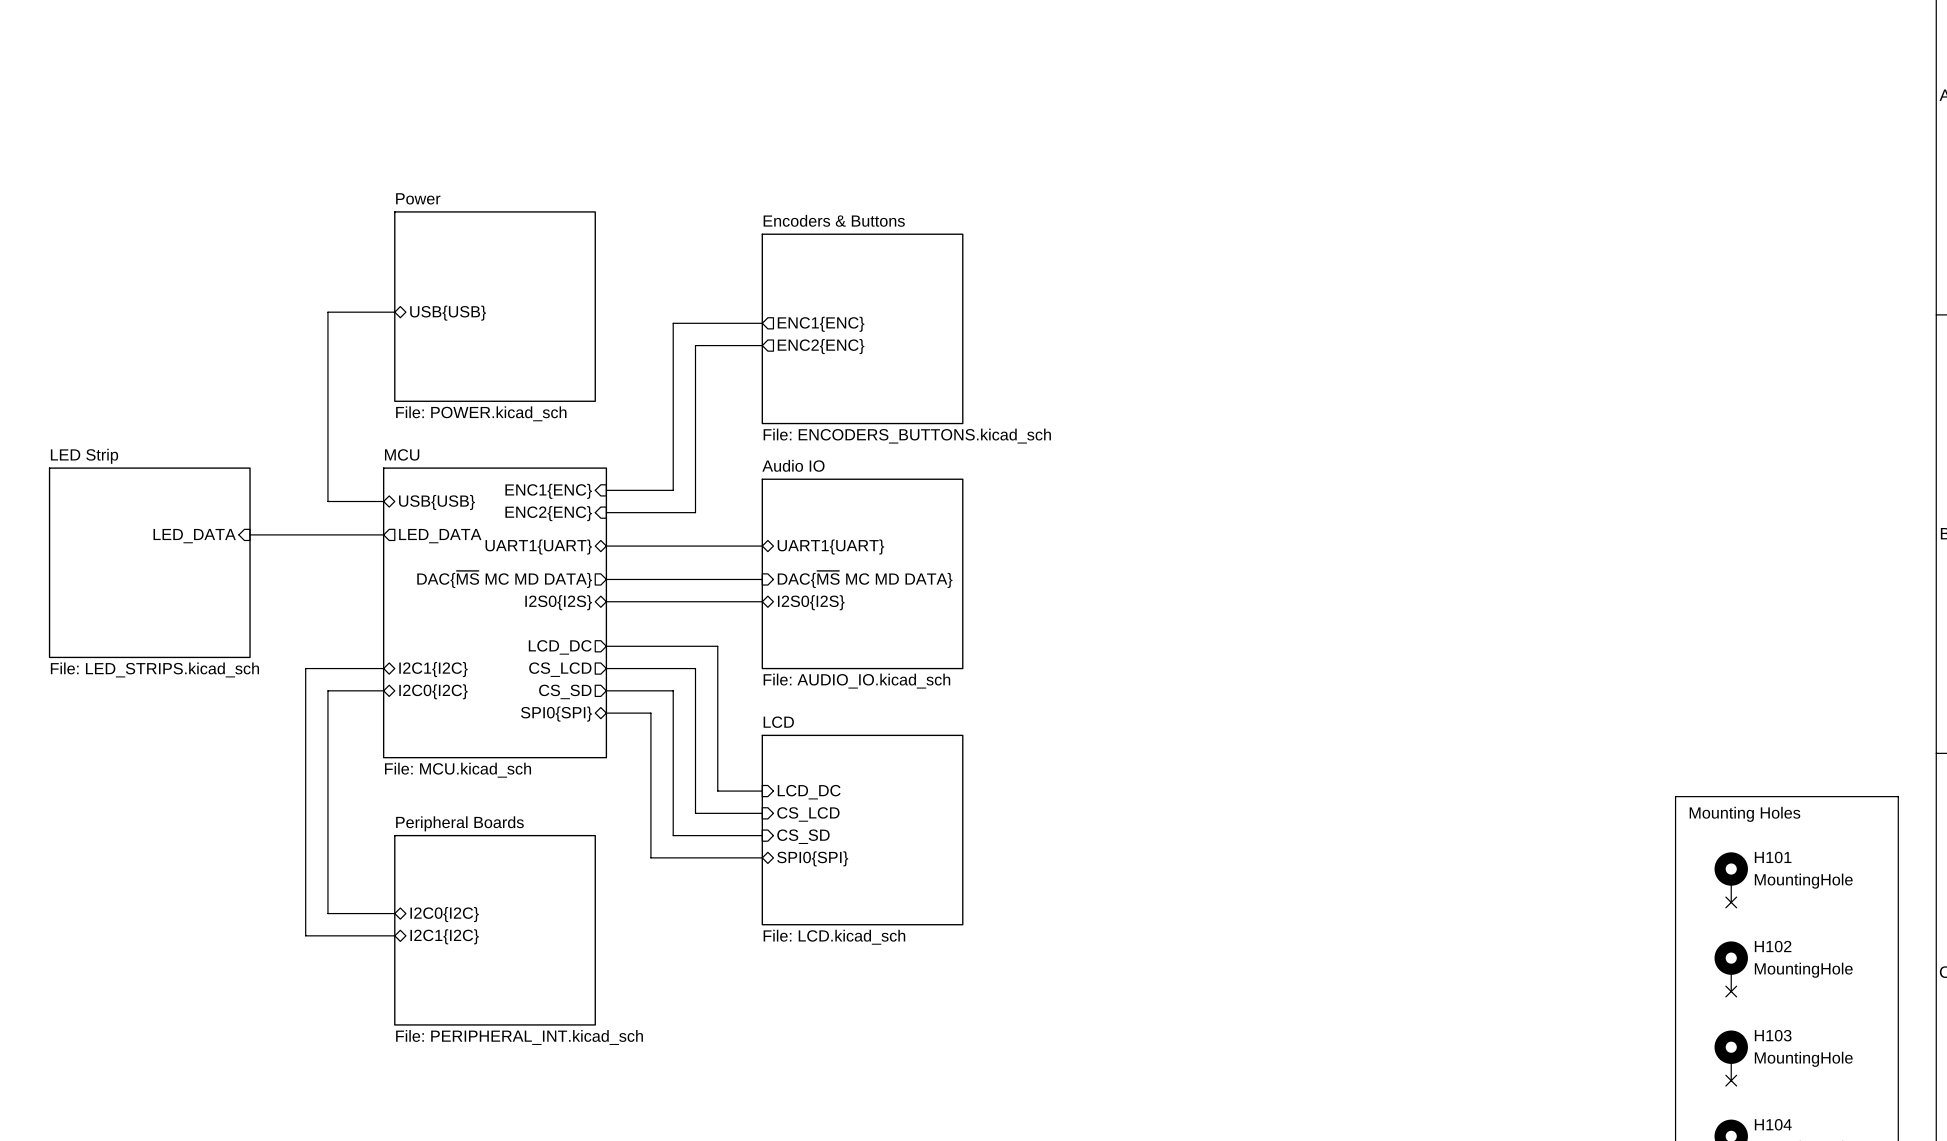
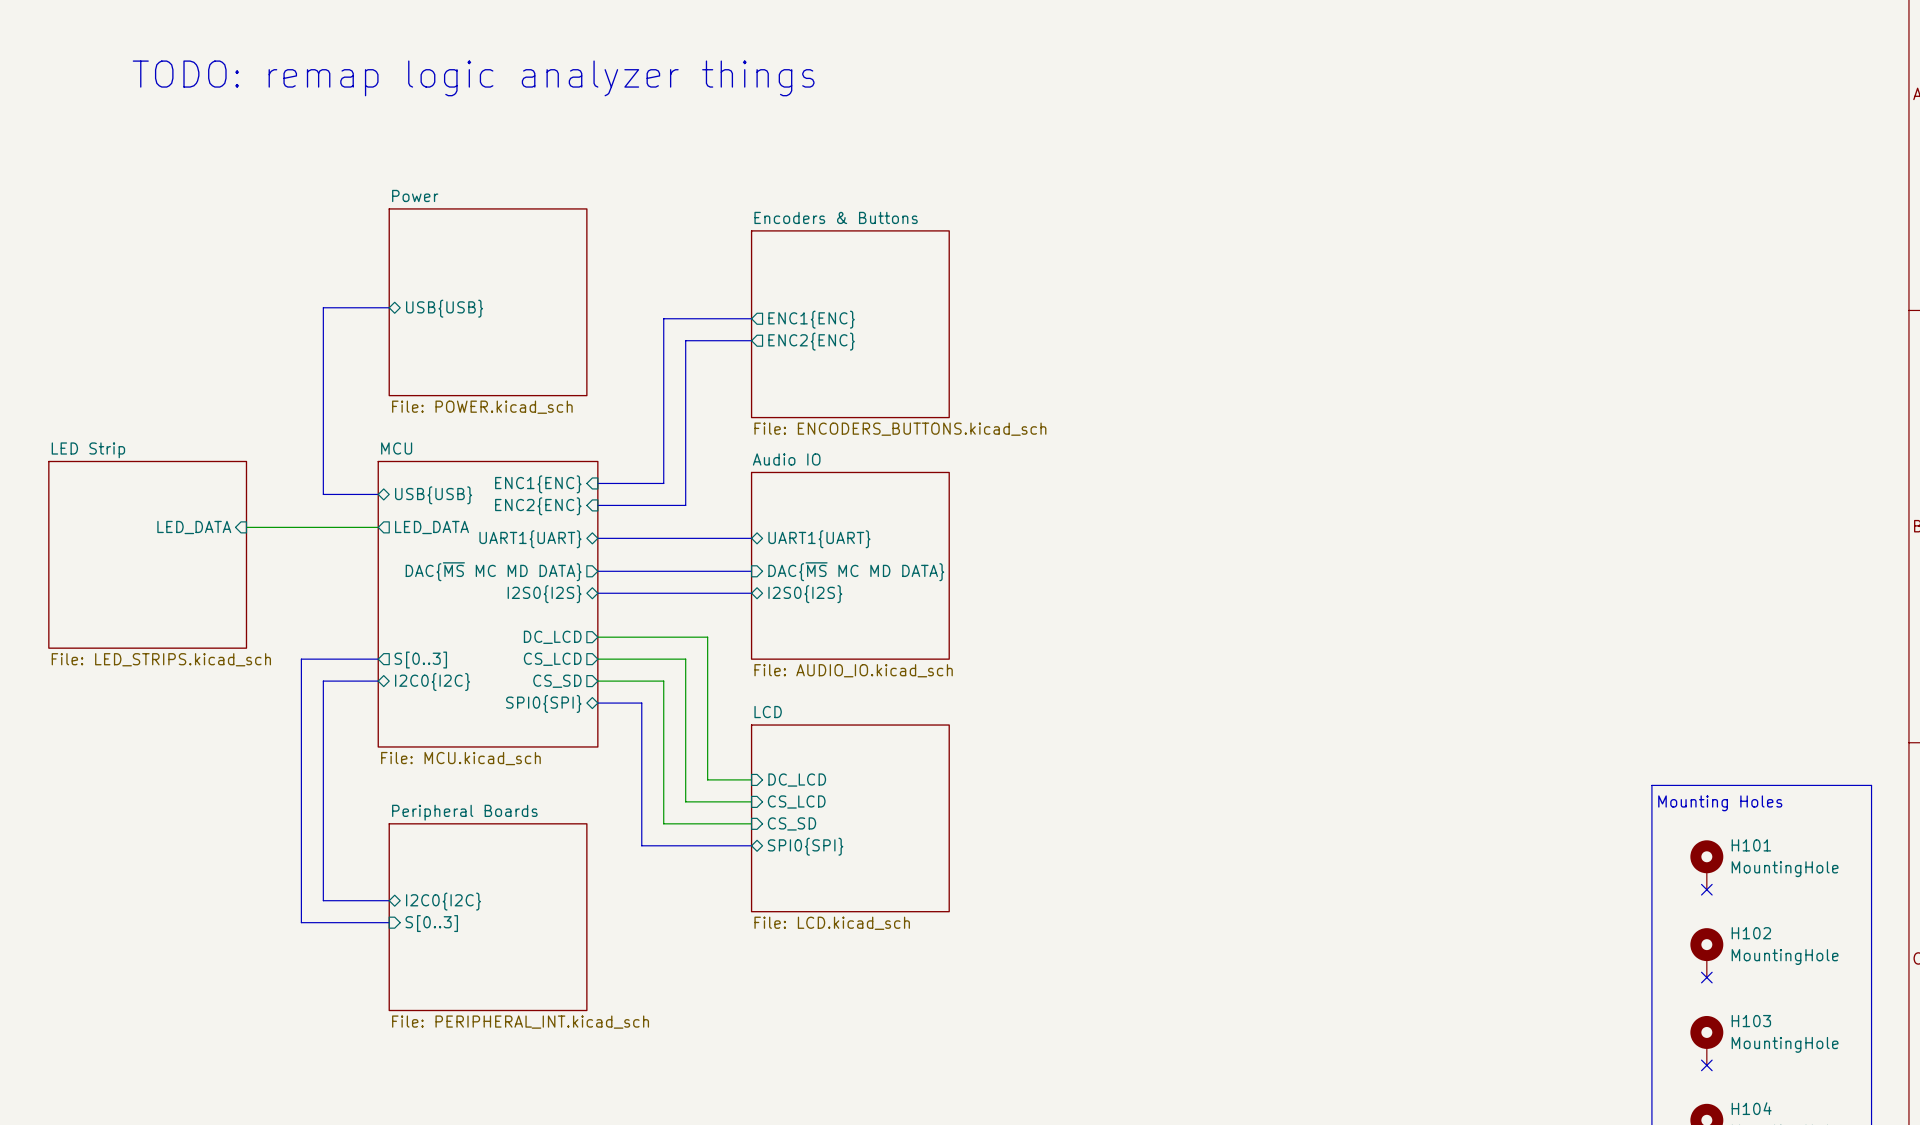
text: none -> TODO: remap logic analyzer things (473, 78)
sheet pin: LCD_DC (560, 647) -> DC_LCD (552, 637)
sheet pin shape: bidirectional (433, 669) -> output (420, 660)
sheet pin: I2C1{I2C} (433, 669) -> S[0..3] (420, 660)
sheet pin: LCD_DC (809, 792) -> DC_LCD (797, 780)
sheet pin shape: bidirectional (444, 936) -> input (431, 923)
sheet pin: I2C1{I2C} (444, 936) -> S[0..3] (431, 923)

